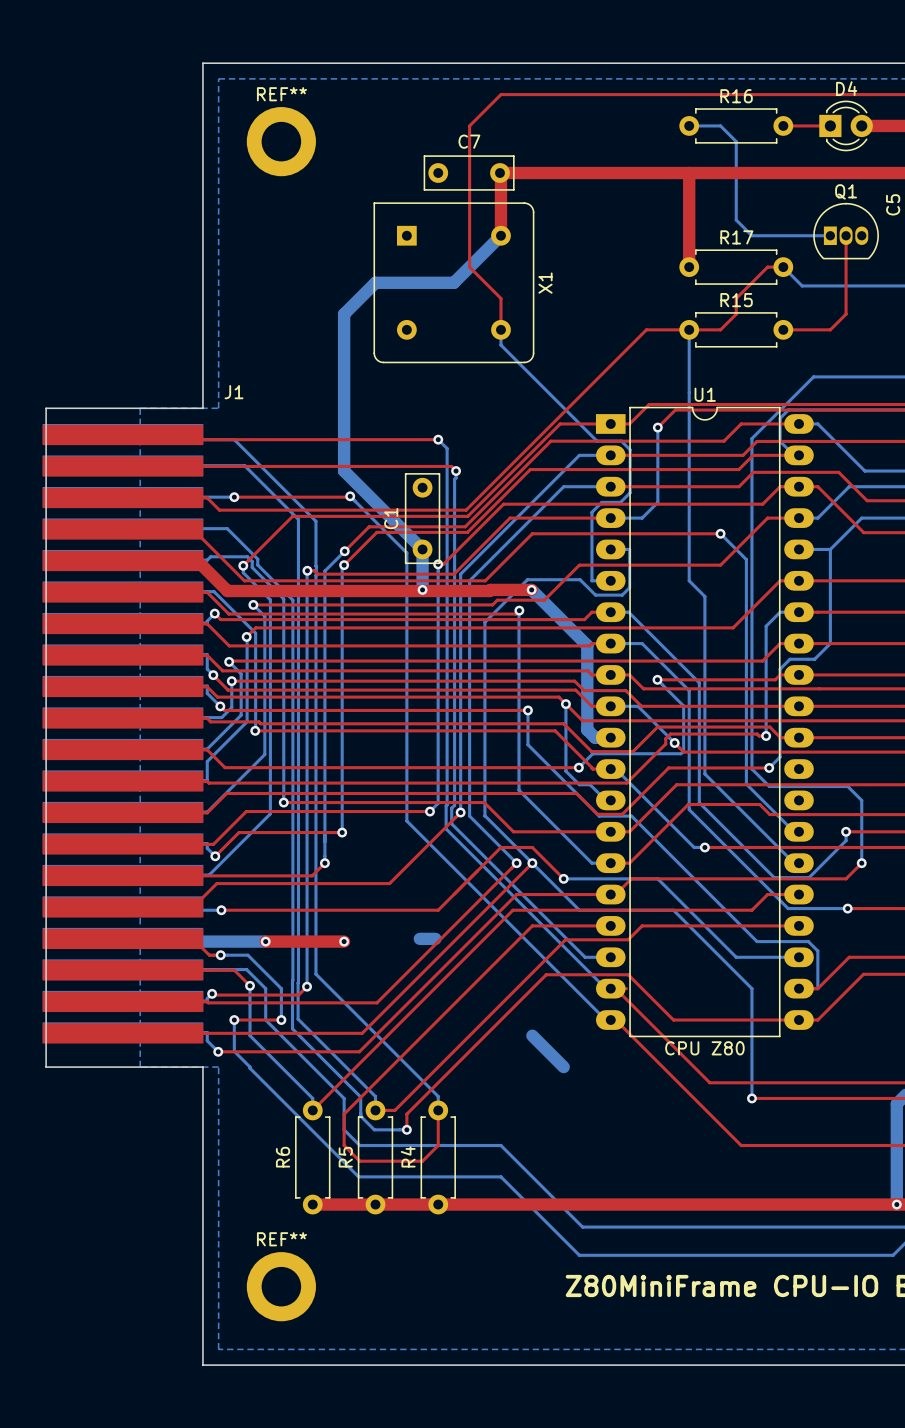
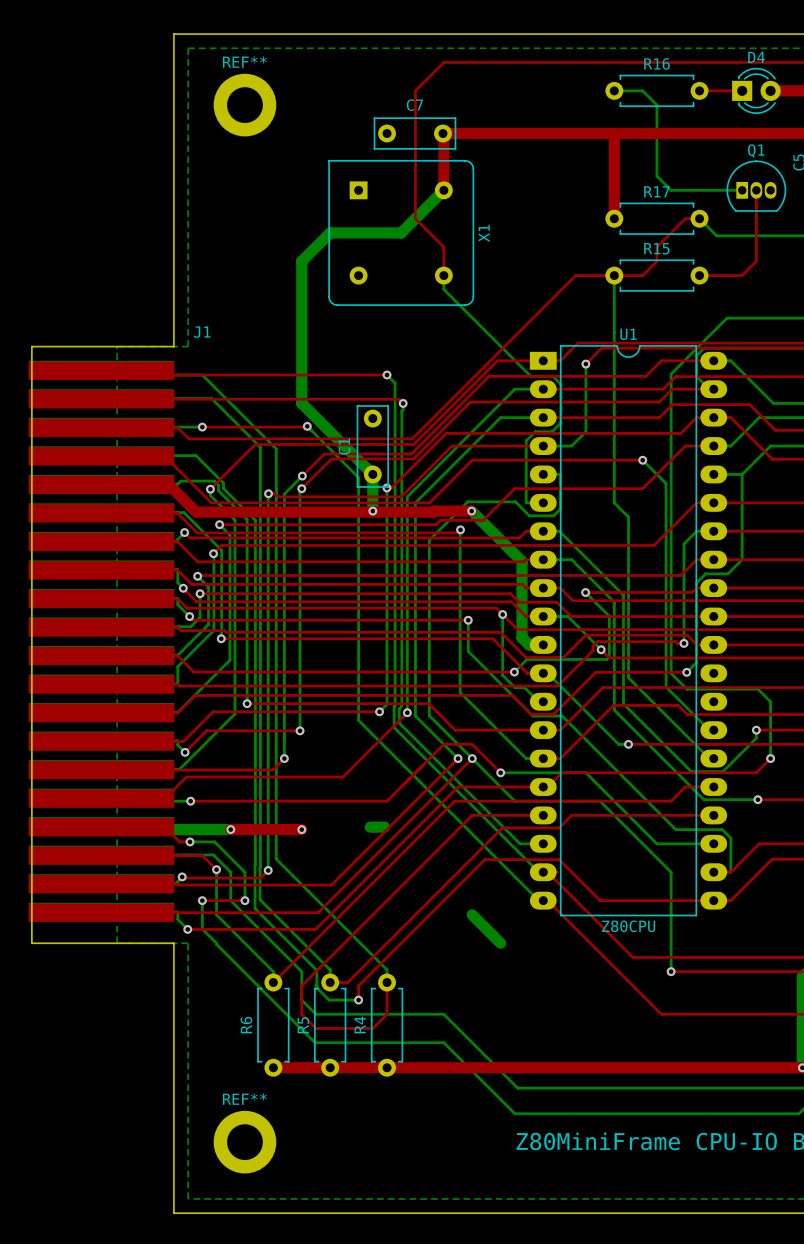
U1 value: CPU Z80 (704, 1048) -> Z80CPU (628, 926)

